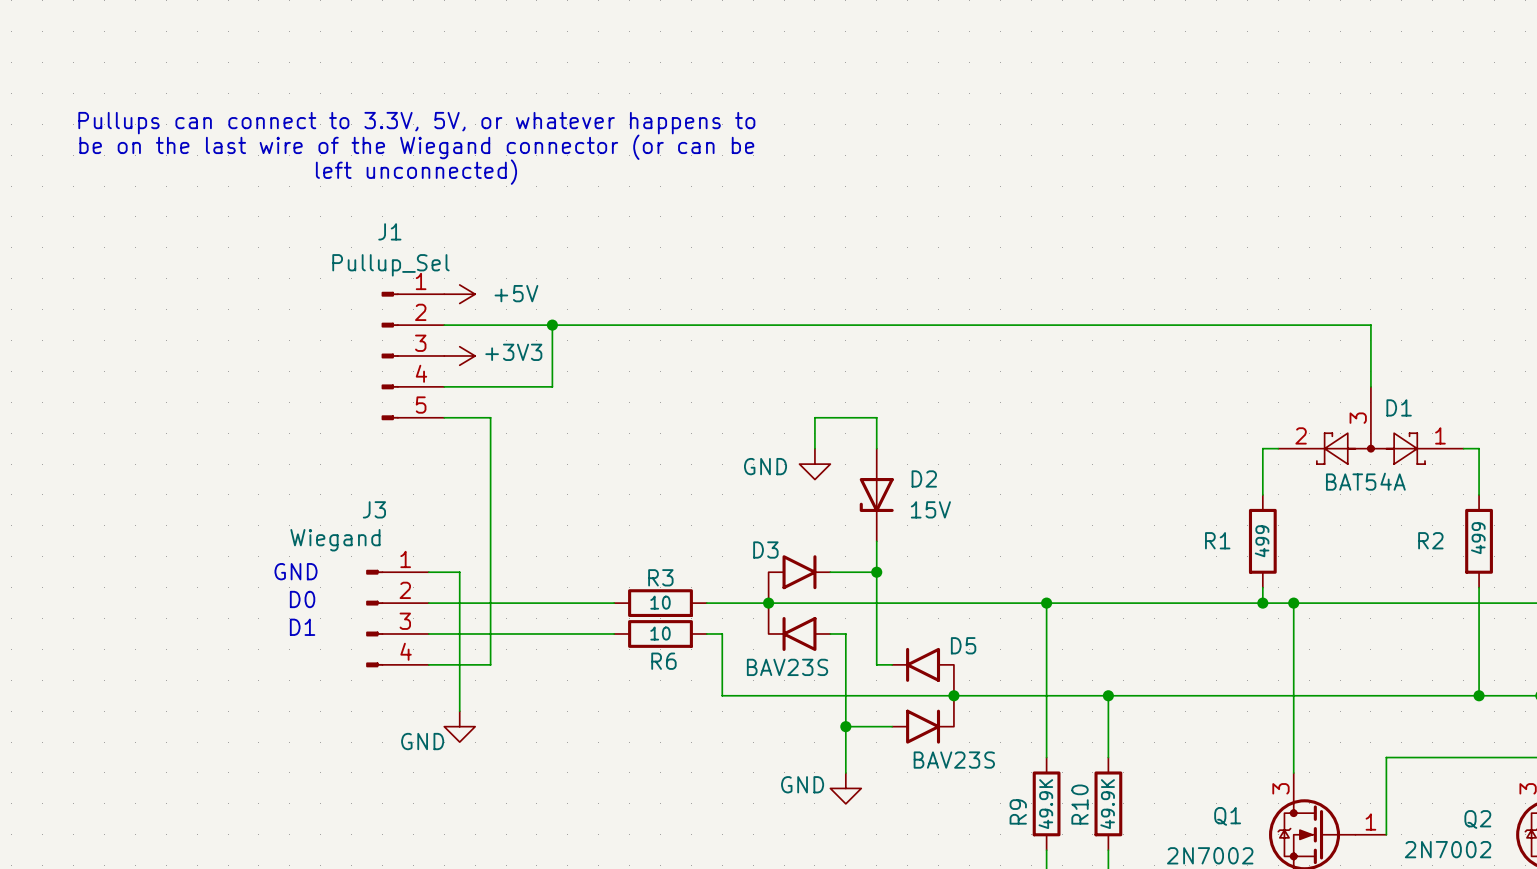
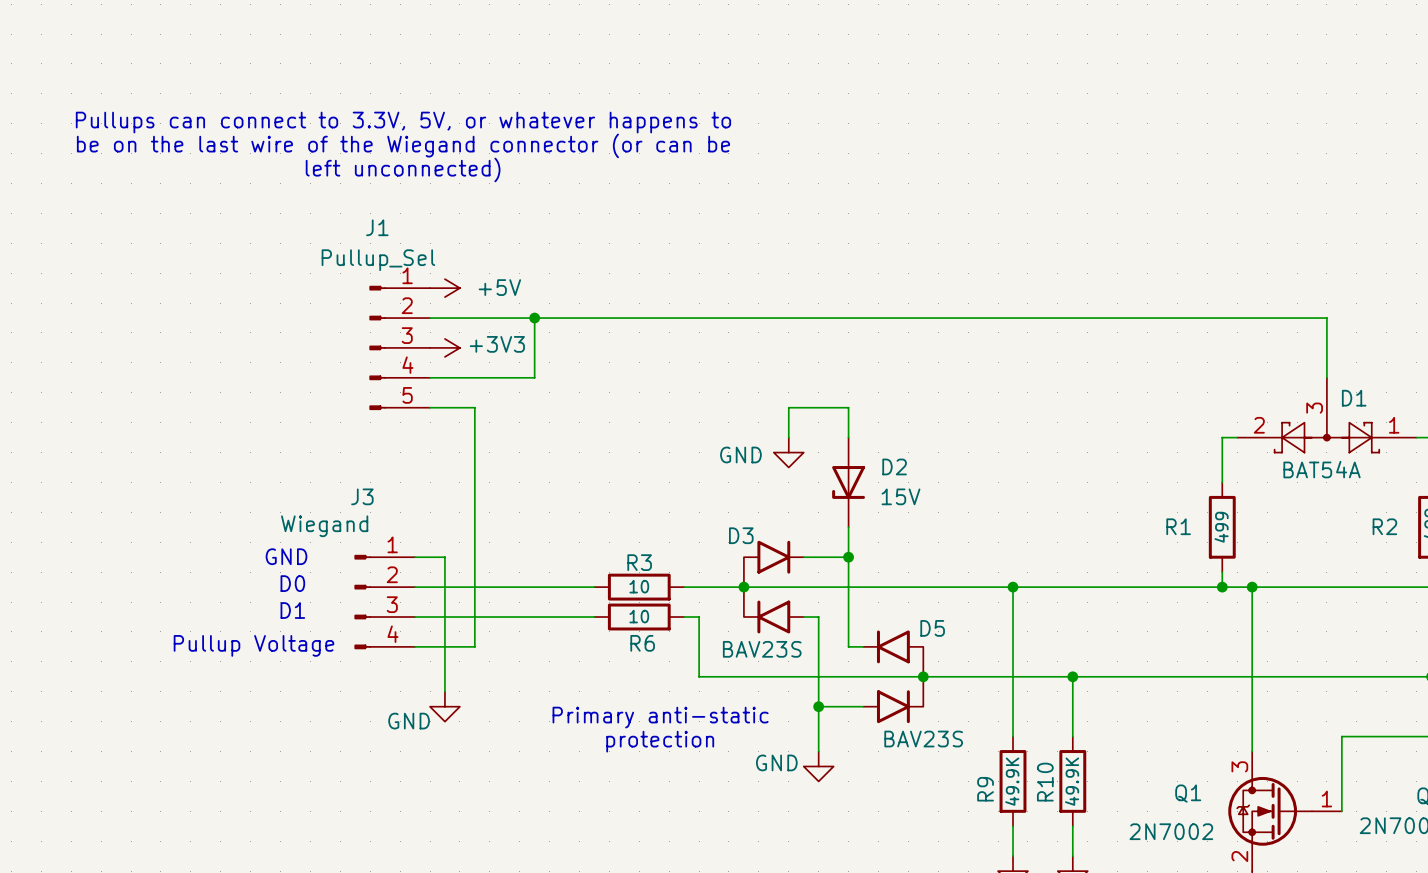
text: none -> Pullup Voltage (253, 645)
text: none -> Primary anti-static (660, 717)
text: none -> protection (660, 741)

